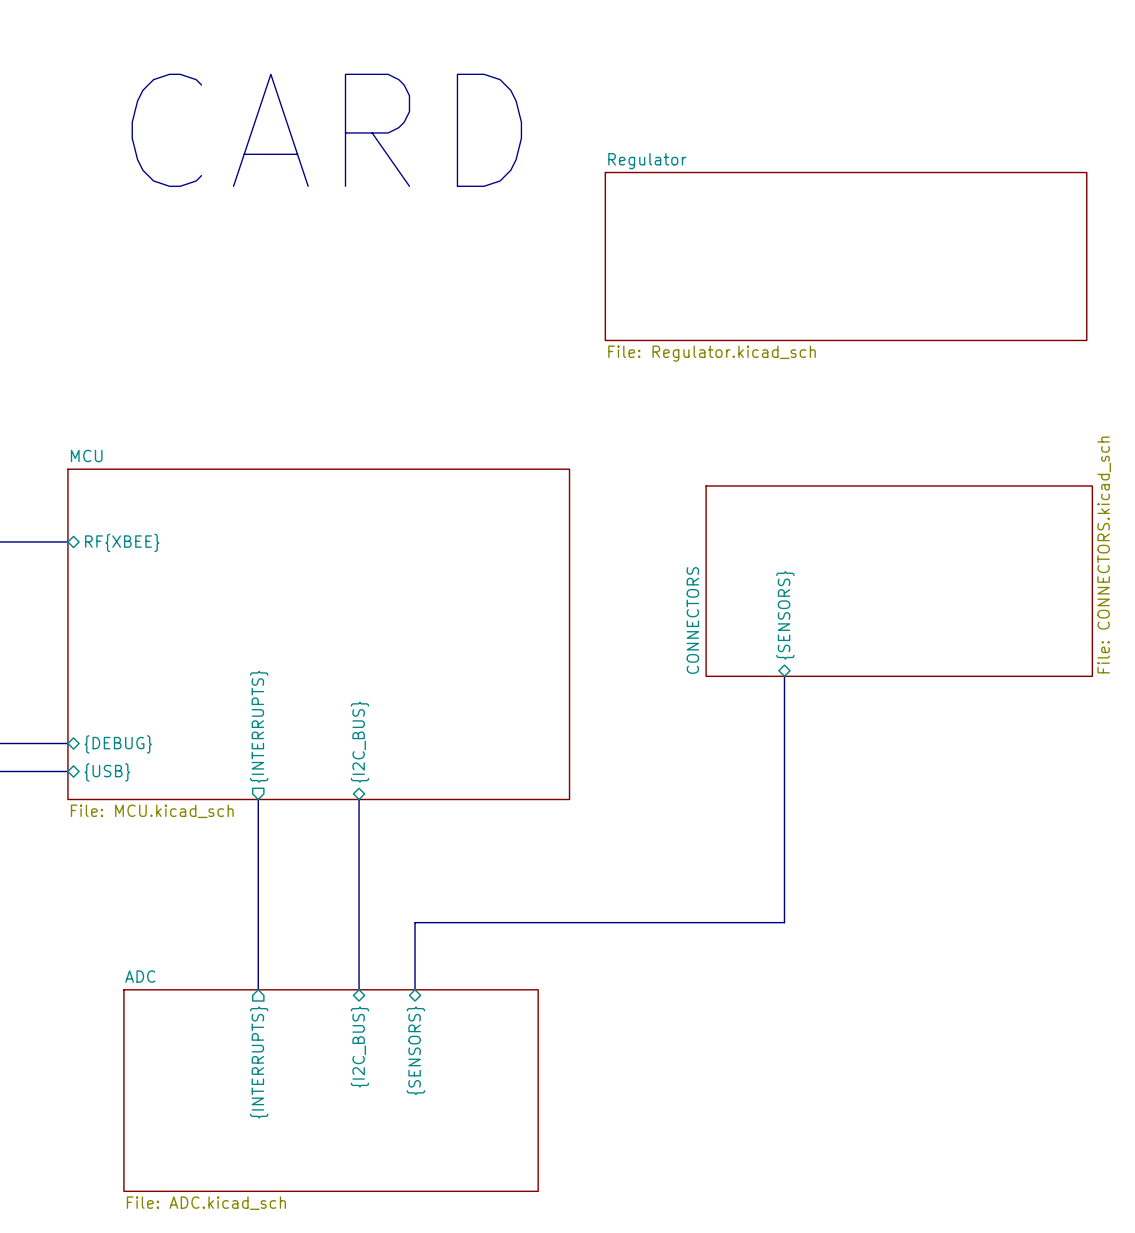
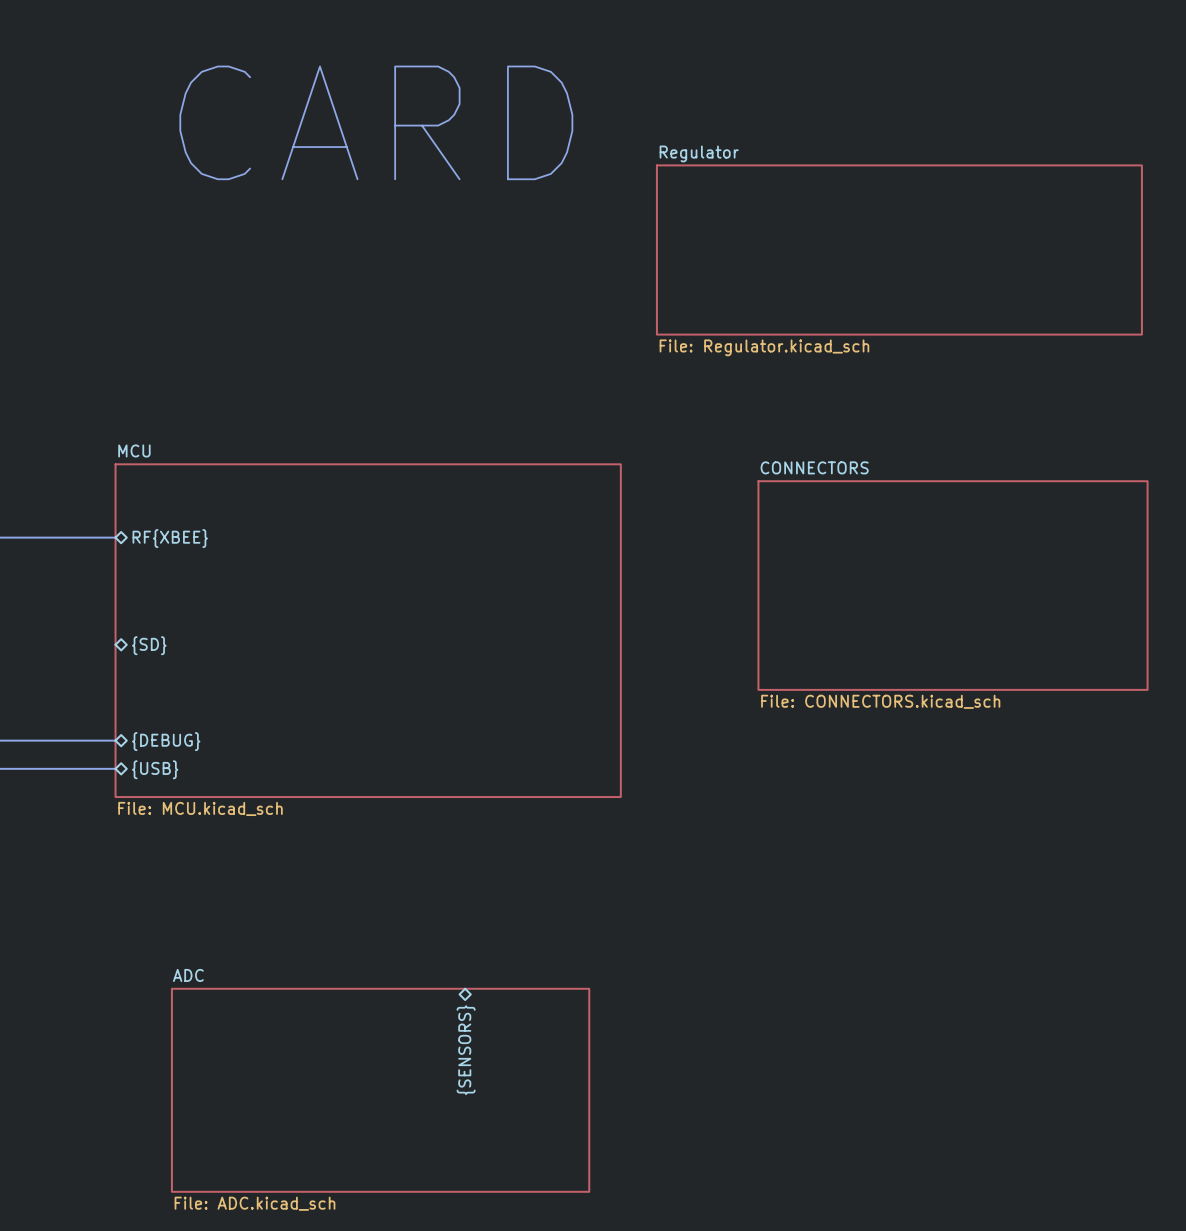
sheet CONNECTORS shape: [705, 485, 1094, 678] -> [757, 480, 1149, 691]
sheet CONNECTORS value position: File: CONNECTORS.kicad_sch (1104, 554) -> File: CONNECTORS.kicad_sch (880, 701)
sheet pin: {SENSORS} (785, 615) -> none
sheet CONNECTORS name position: CONNECTORS (692, 620) -> CONNECTORS (814, 467)
sheet pin: none -> {SD} (149, 645)
bus: (784, 676) (784, 922) (415, 922) (415, 989) -> none
sheet pin: {INTERRUPTS} (259, 726) -> none
sheet pin: {I2C_BUS} (359, 742) -> none
bus: (258, 799) (258, 989) -> none
bus: (359, 799) (359, 989) -> none
sheet pin: {I2C_BUS} (359, 1047) -> none
sheet pin: {INTERRUPTS} (259, 1062) -> none

